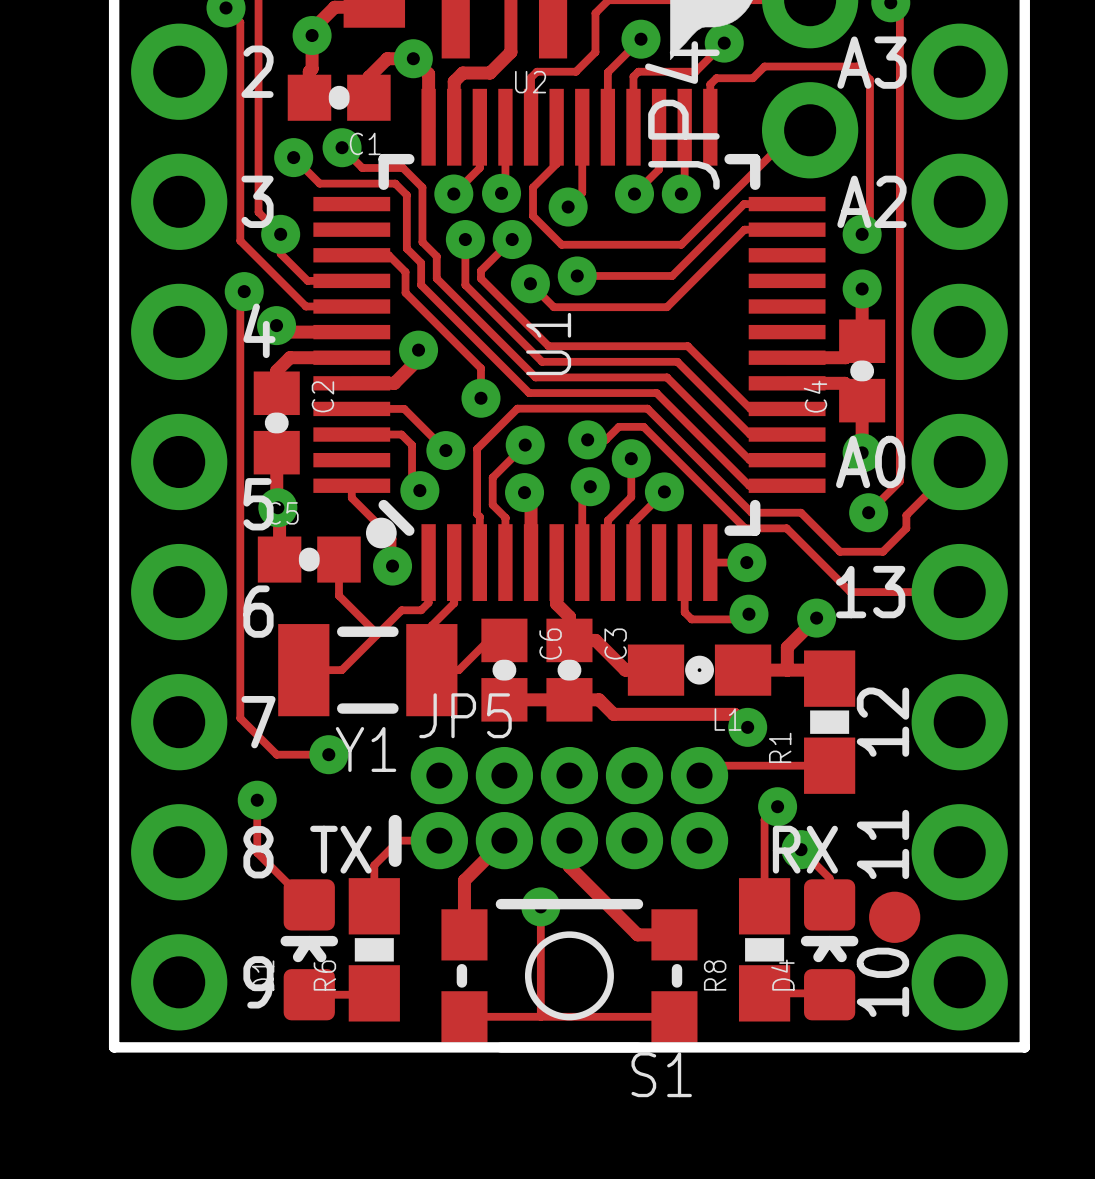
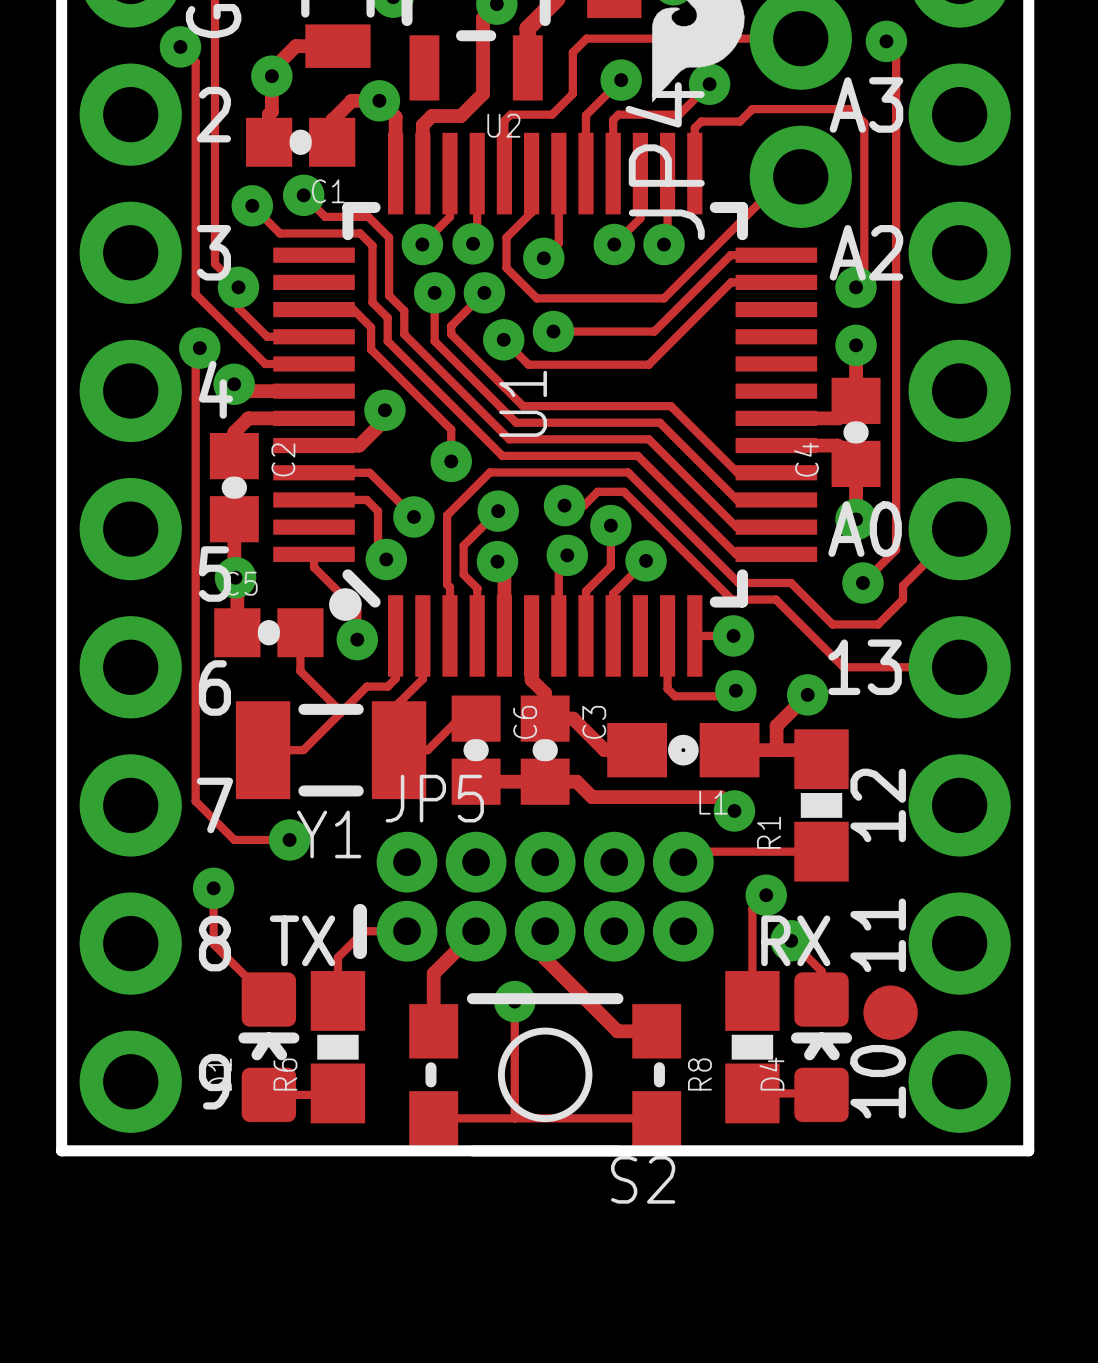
S1 name: S1 (661, 1074) -> S2 (643, 1179)

